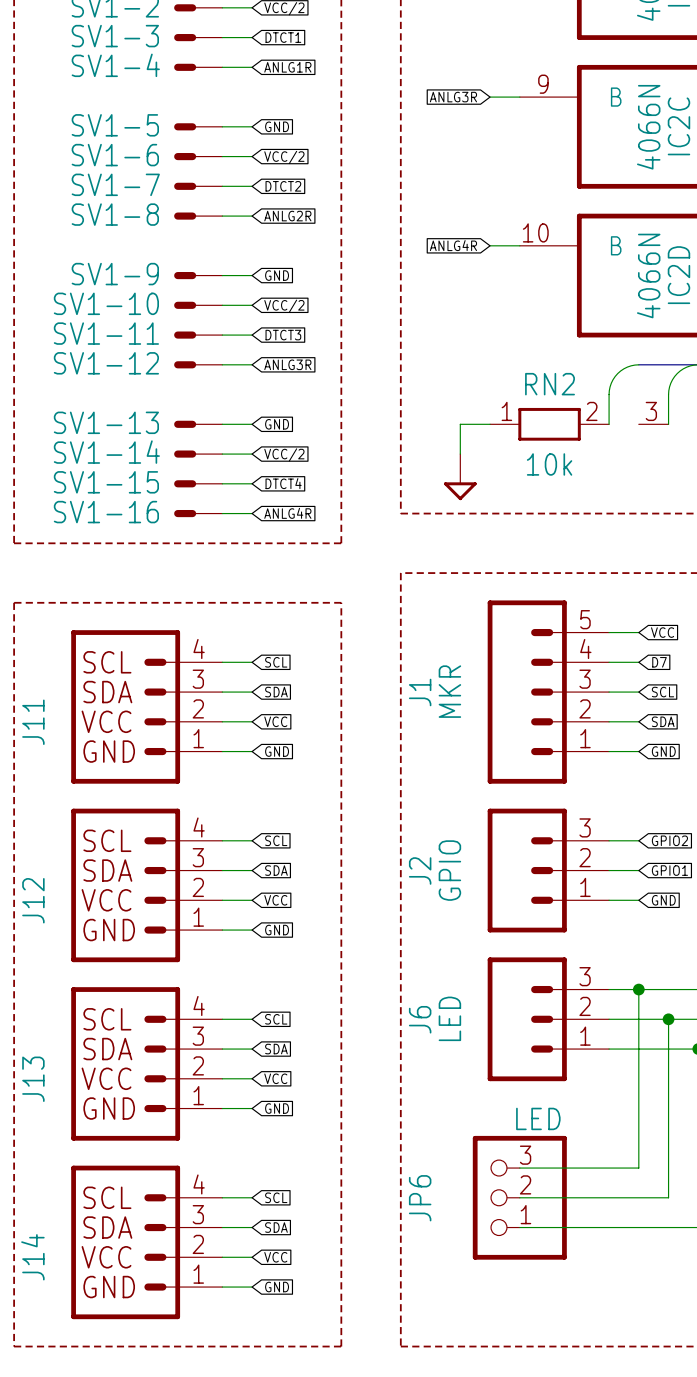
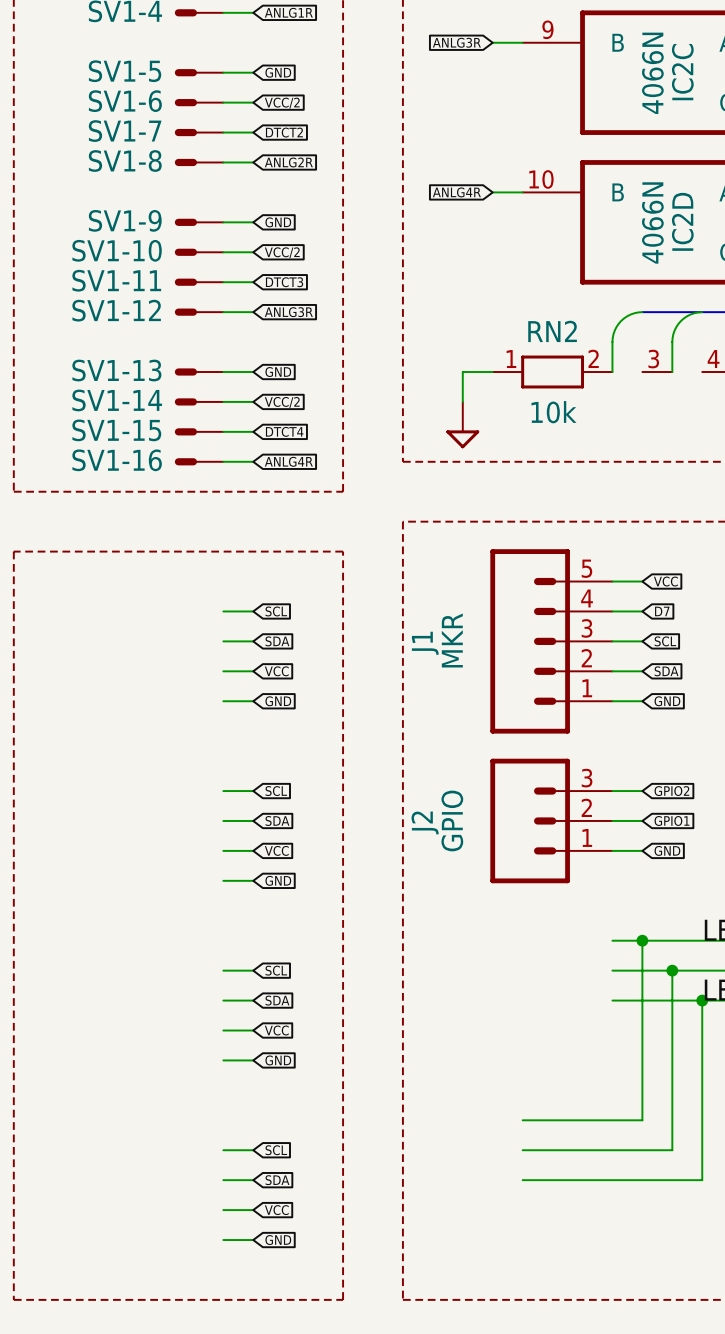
J11: (146, 706) -> none
J12: (146, 885) -> none
J6: LED (548, 1019) -> none
J13: (146, 1063) -> none
JP6: LED (519, 1197) -> none
J14: (146, 1242) -> none

